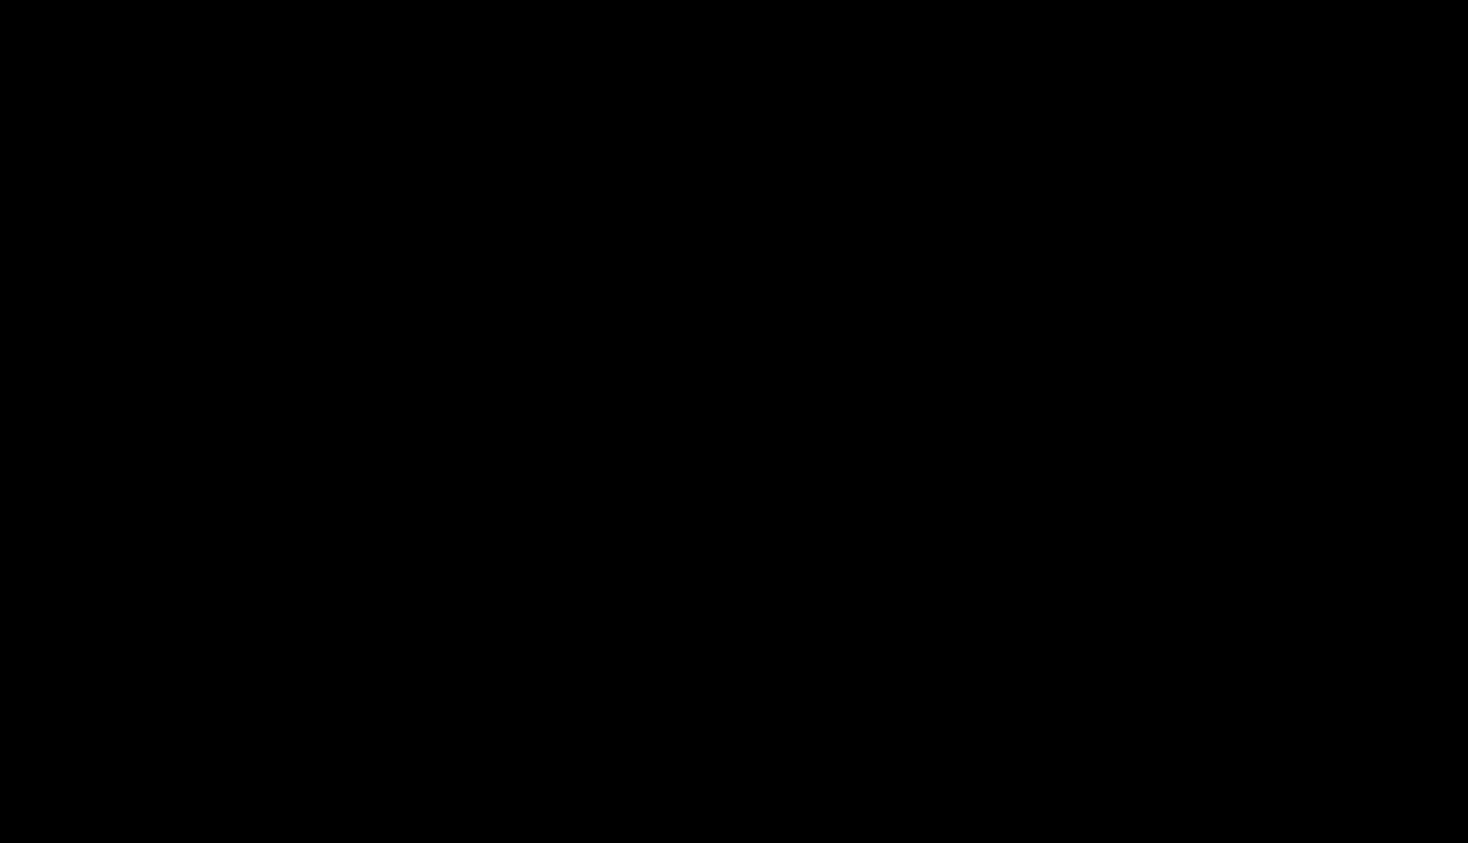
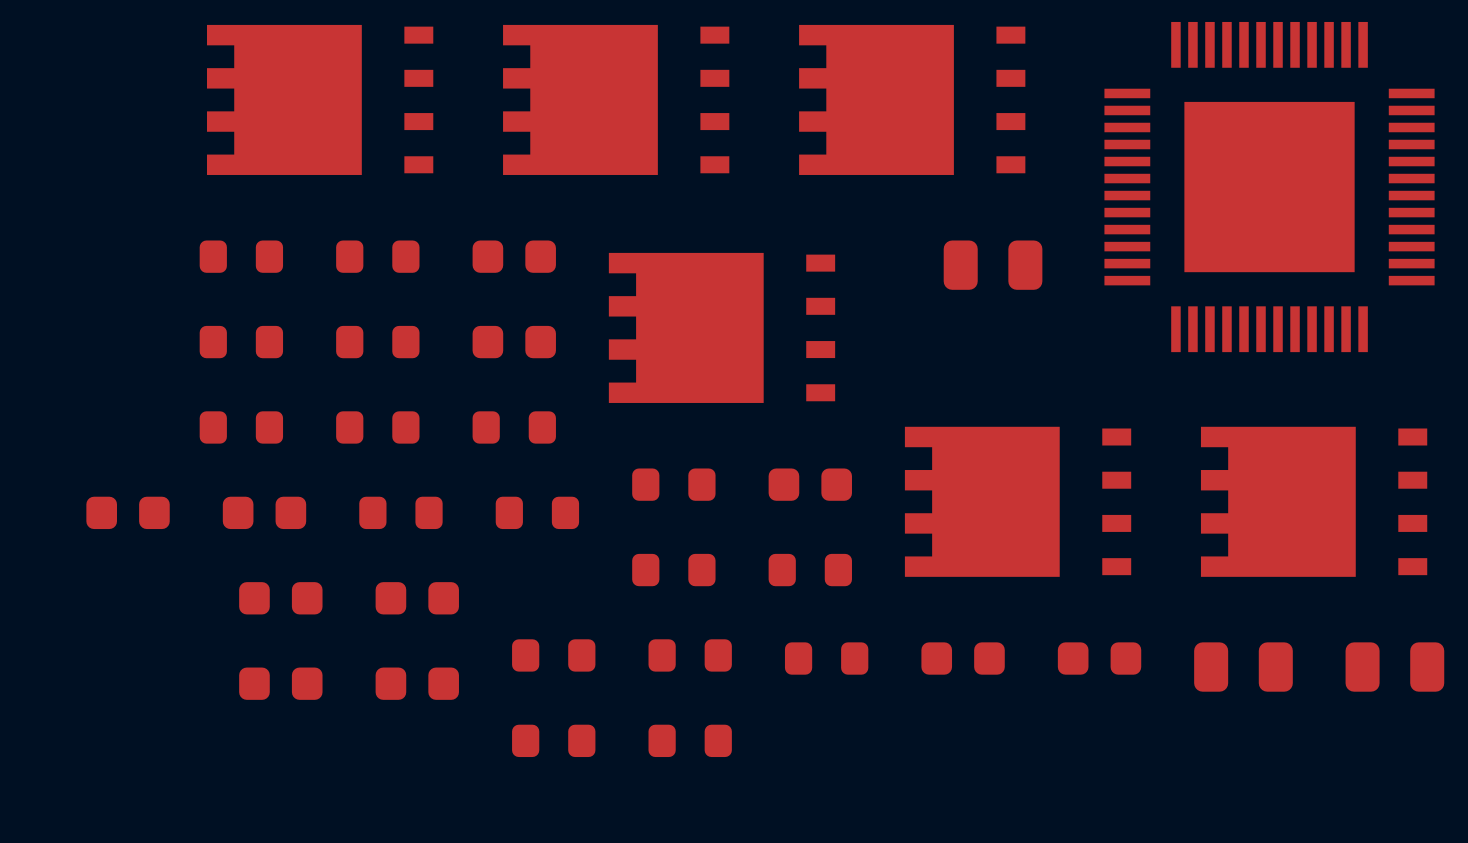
part: none -> (320, 99)
part: none -> (616, 99)
part: none -> (912, 99)
part: none -> (1269, 187)
part: none -> (241, 256)
part: none -> (377, 256)
part: none -> (514, 256)
part: none -> (993, 265)
part: none -> (722, 327)
part: none -> (241, 342)
part: none -> (377, 342)
part: none -> (514, 342)
part: none -> (241, 427)
part: none -> (377, 427)
part: none -> (514, 427)
part: none -> (673, 484)
part: none -> (810, 484)
part: none -> (1018, 501)
part: none -> (1314, 501)
part: none -> (128, 512)
part: none -> (264, 512)
part: none -> (400, 512)
part: none -> (537, 512)
part: none -> (673, 570)
part: none -> (810, 570)
part: none -> (280, 598)
part: none -> (417, 598)
part: none -> (553, 655)
part: none -> (690, 655)
part: none -> (826, 658)
part: none -> (963, 658)
part: none -> (1099, 658)
part: none -> (1243, 667)
part: none -> (1394, 667)
part: none -> (280, 683)
part: none -> (417, 683)
part: none -> (553, 740)
part: none -> (690, 740)

